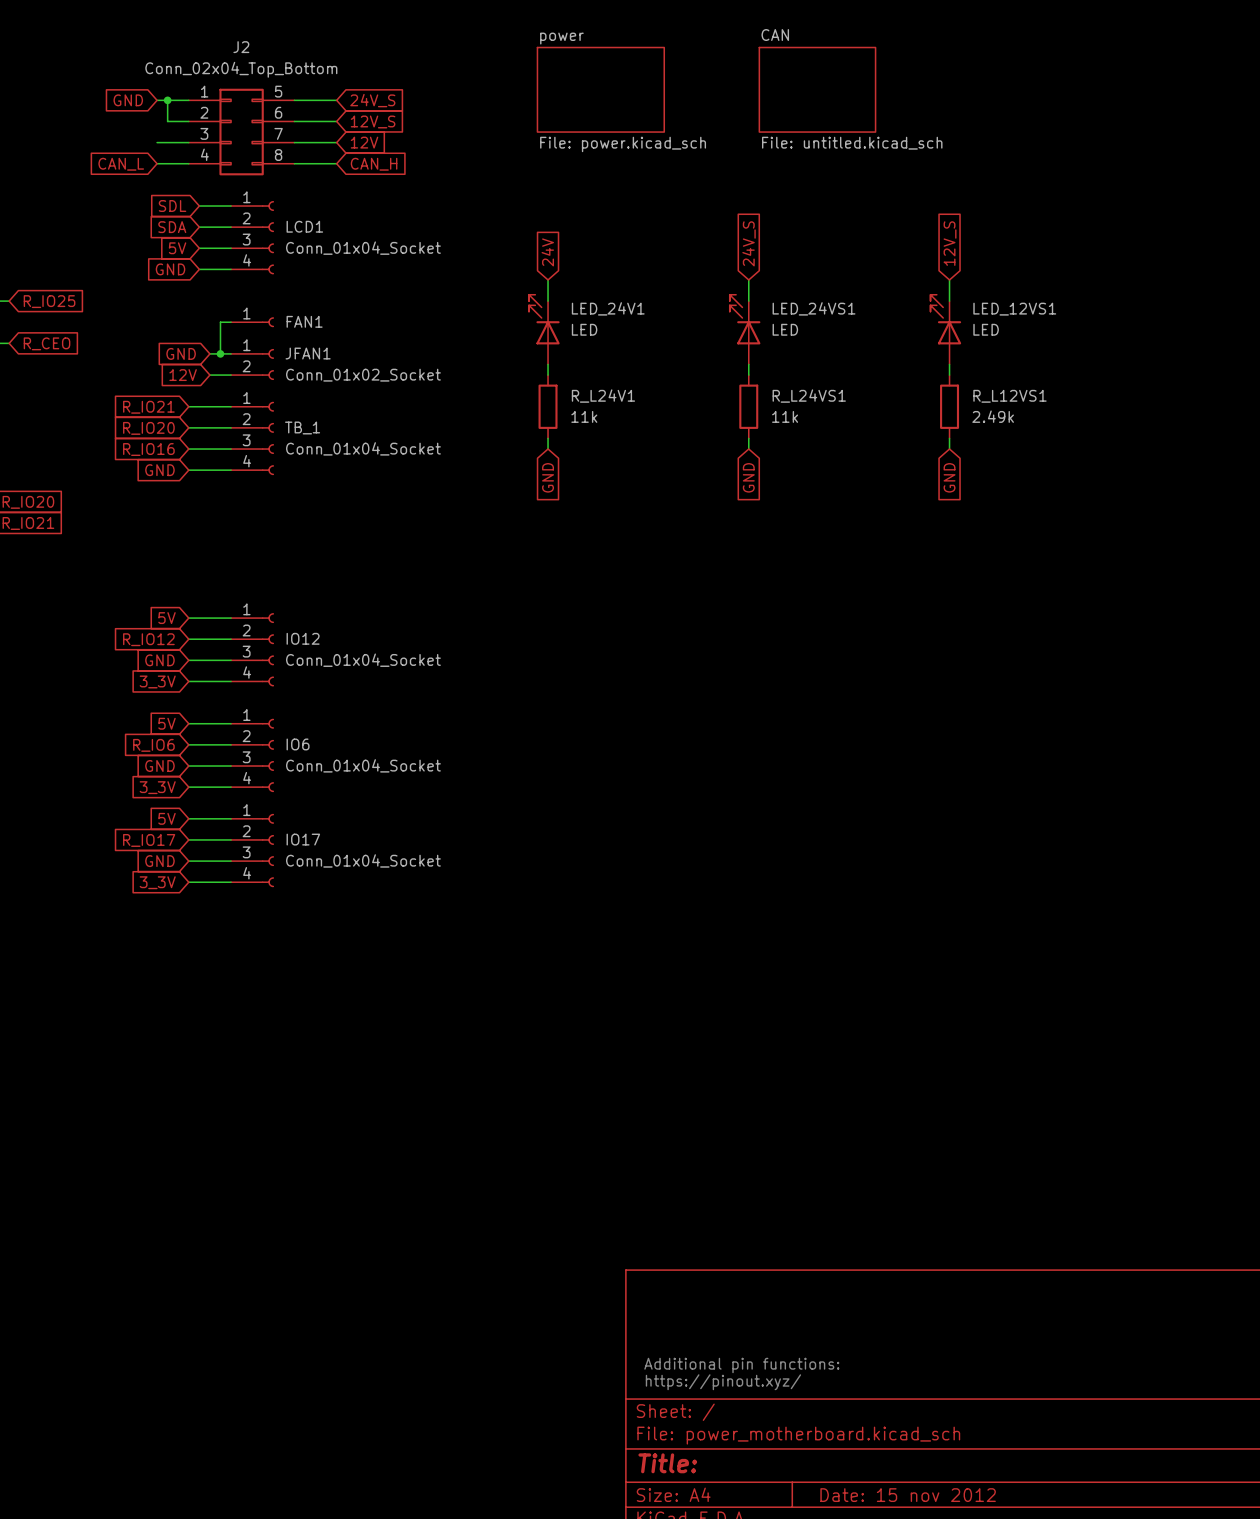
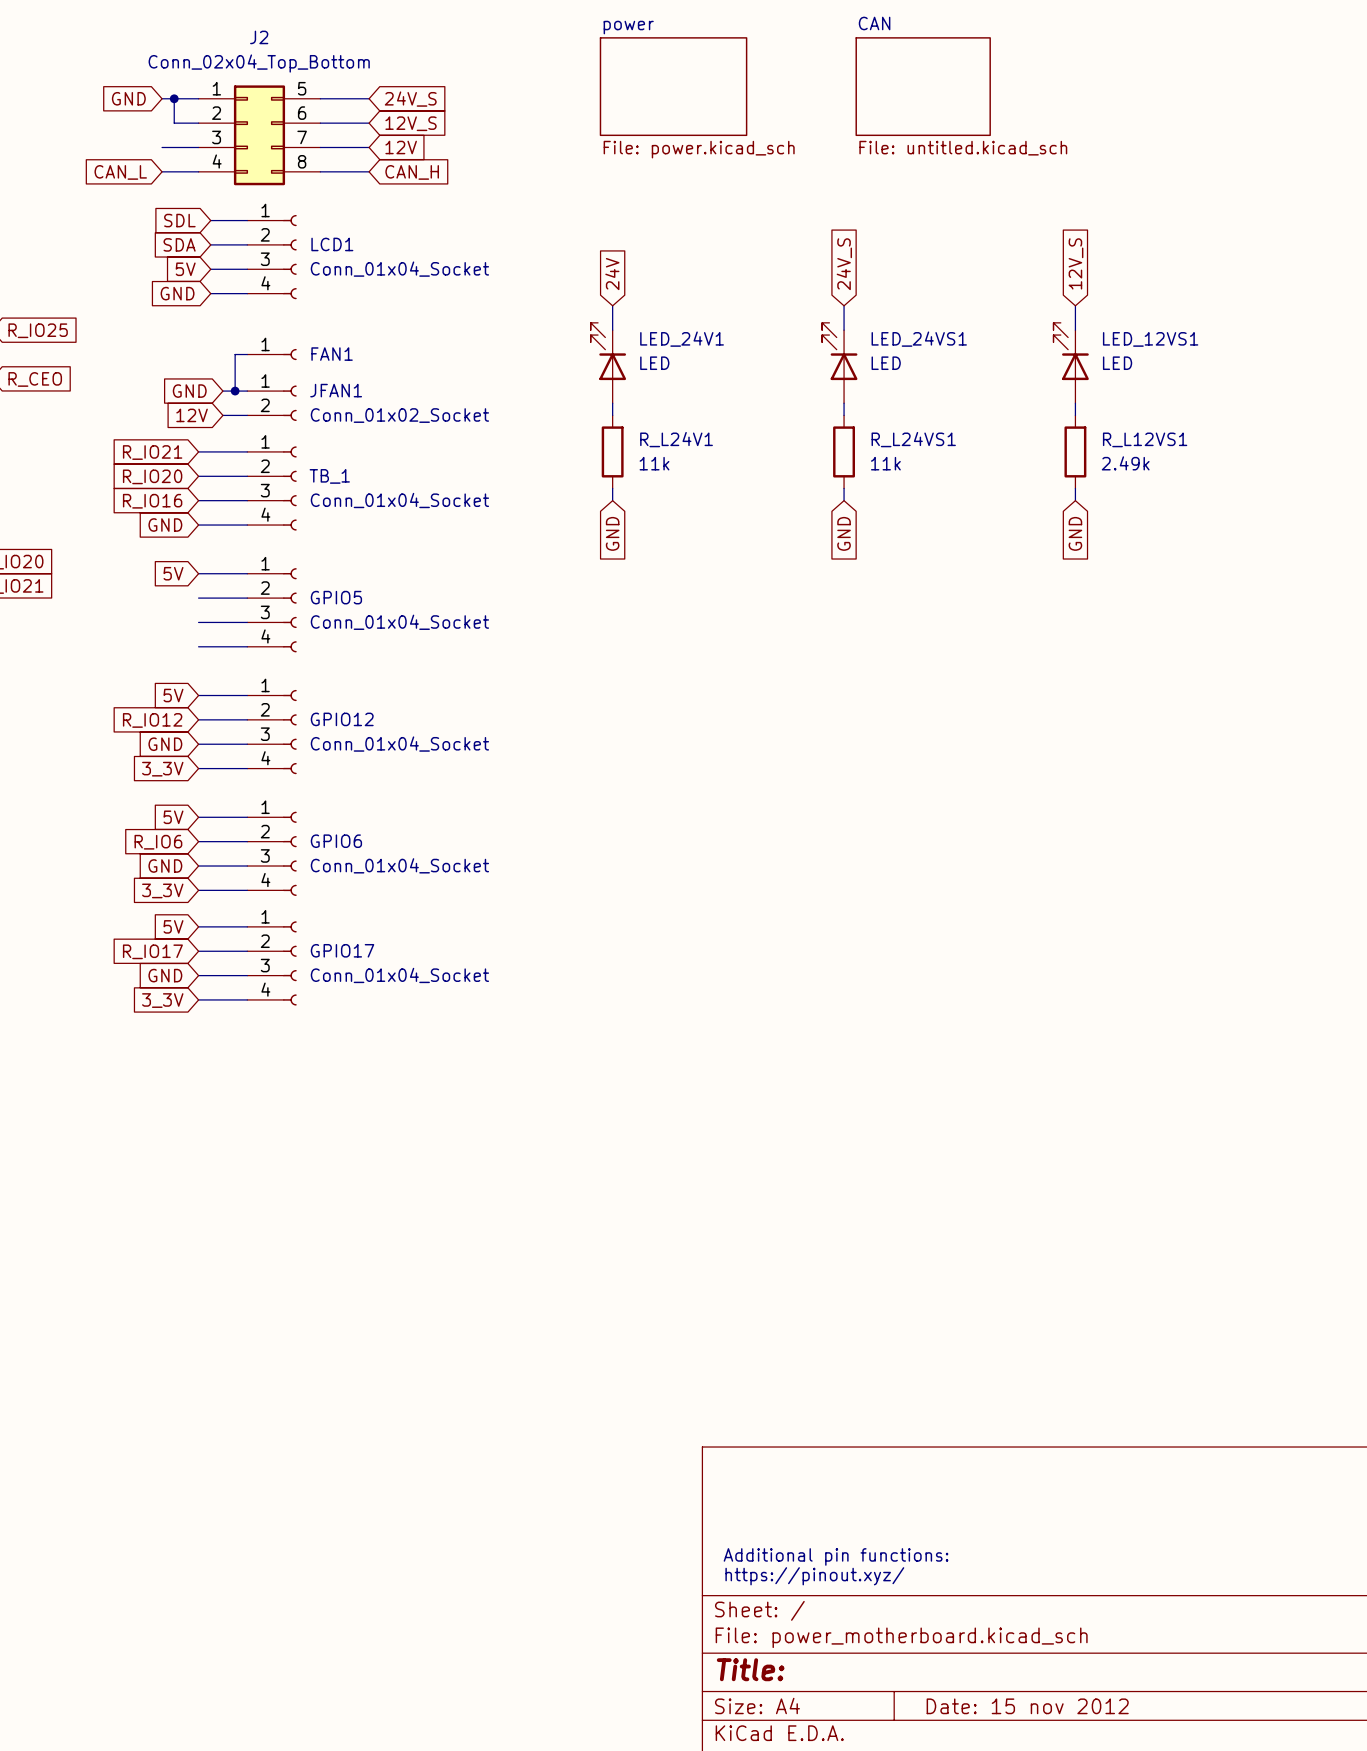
global label: none -> 5V (173, 573)
wire: none -> (198, 573) (247, 573)
wire: none -> (198, 598) (247, 598)
GPIO5: none -> Conn_01x04_Socket (272, 610)
wire: none -> (198, 622) (247, 622)
wire: none -> (198, 646) (247, 646)
IO12 name: IO12 (303, 638) -> GPIO12 (342, 719)
IO6 name: IO6 (298, 744) -> GPIO6 (336, 841)
IO17 name: IO17 (303, 839) -> GPIO17 (342, 950)

